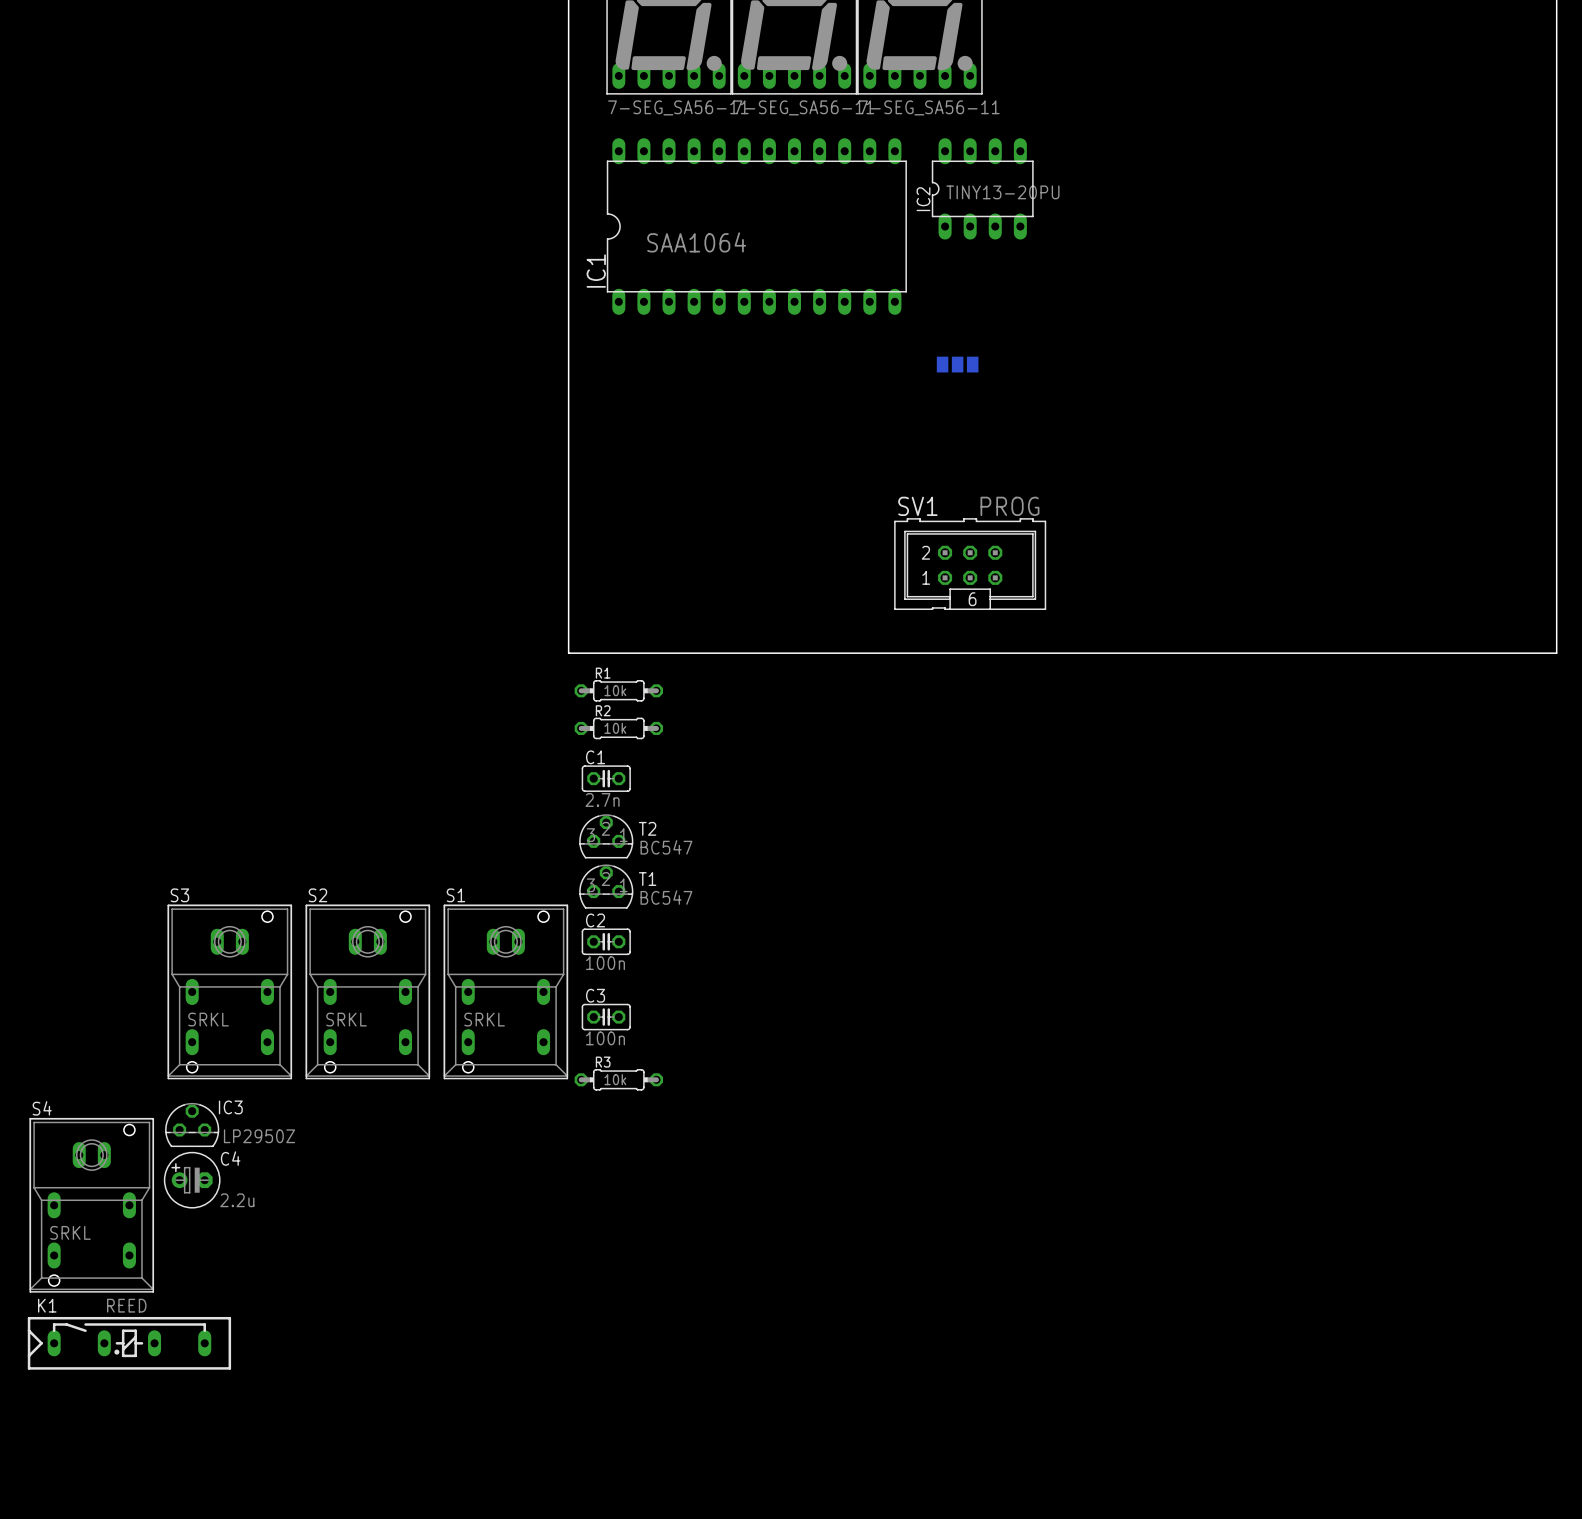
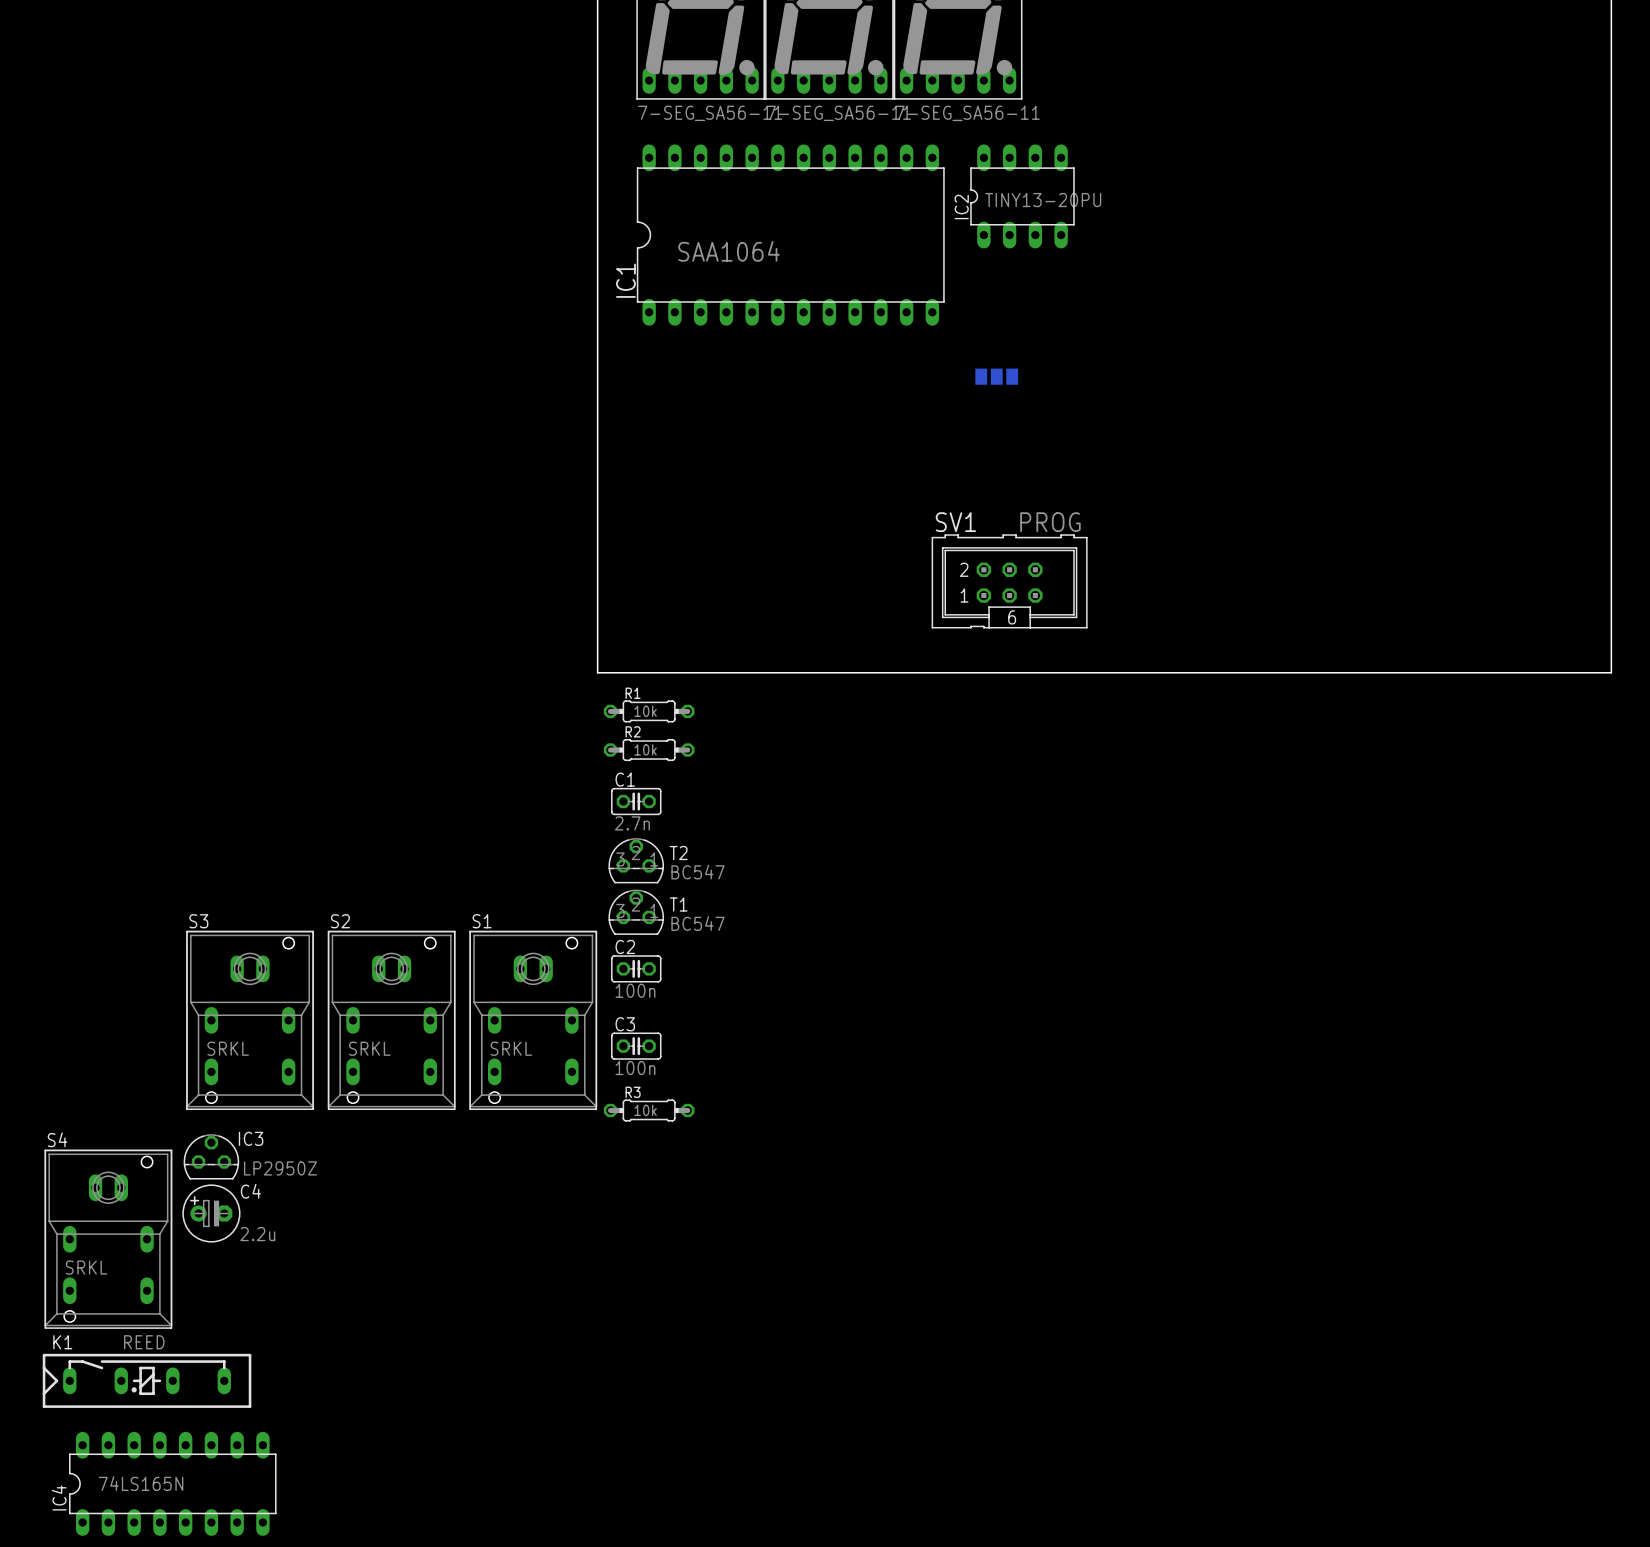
IC4: none -> 74LS165N (172, 1483)

